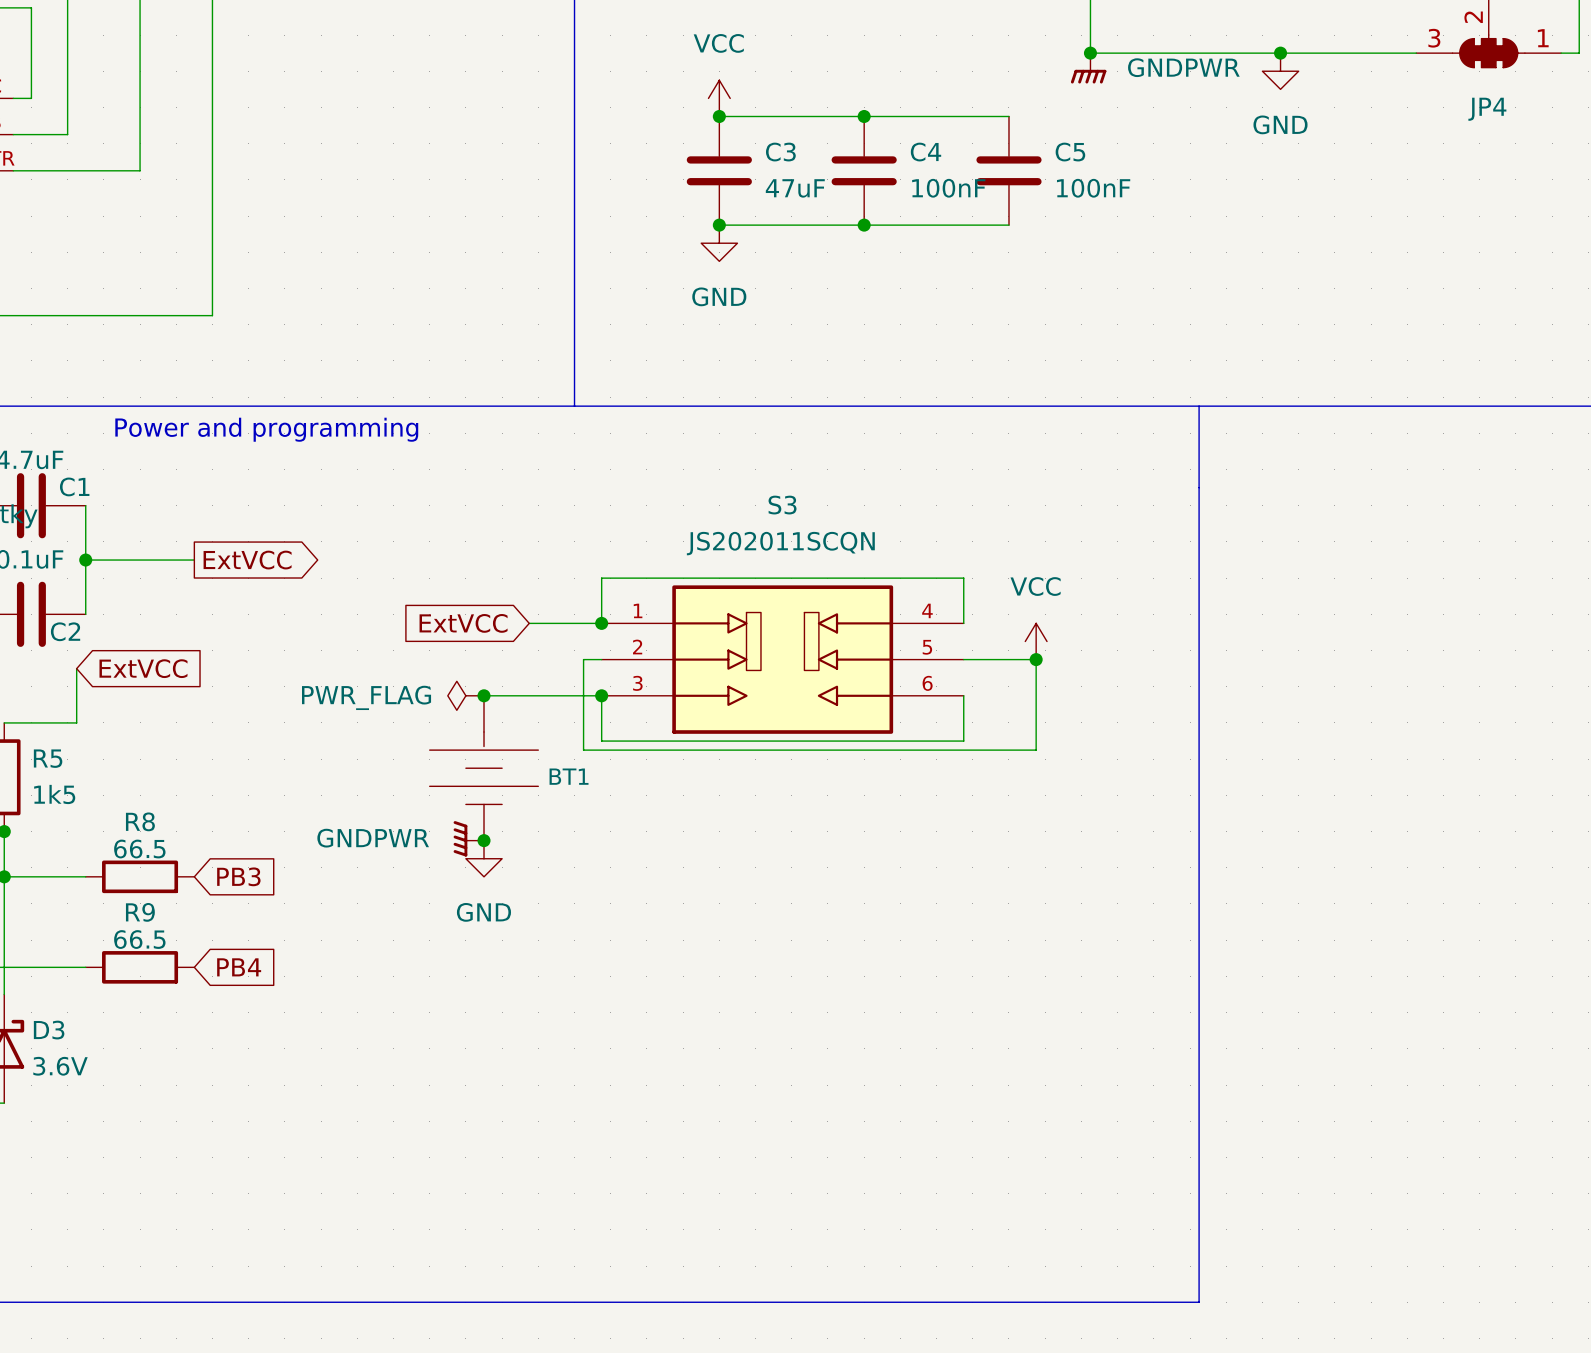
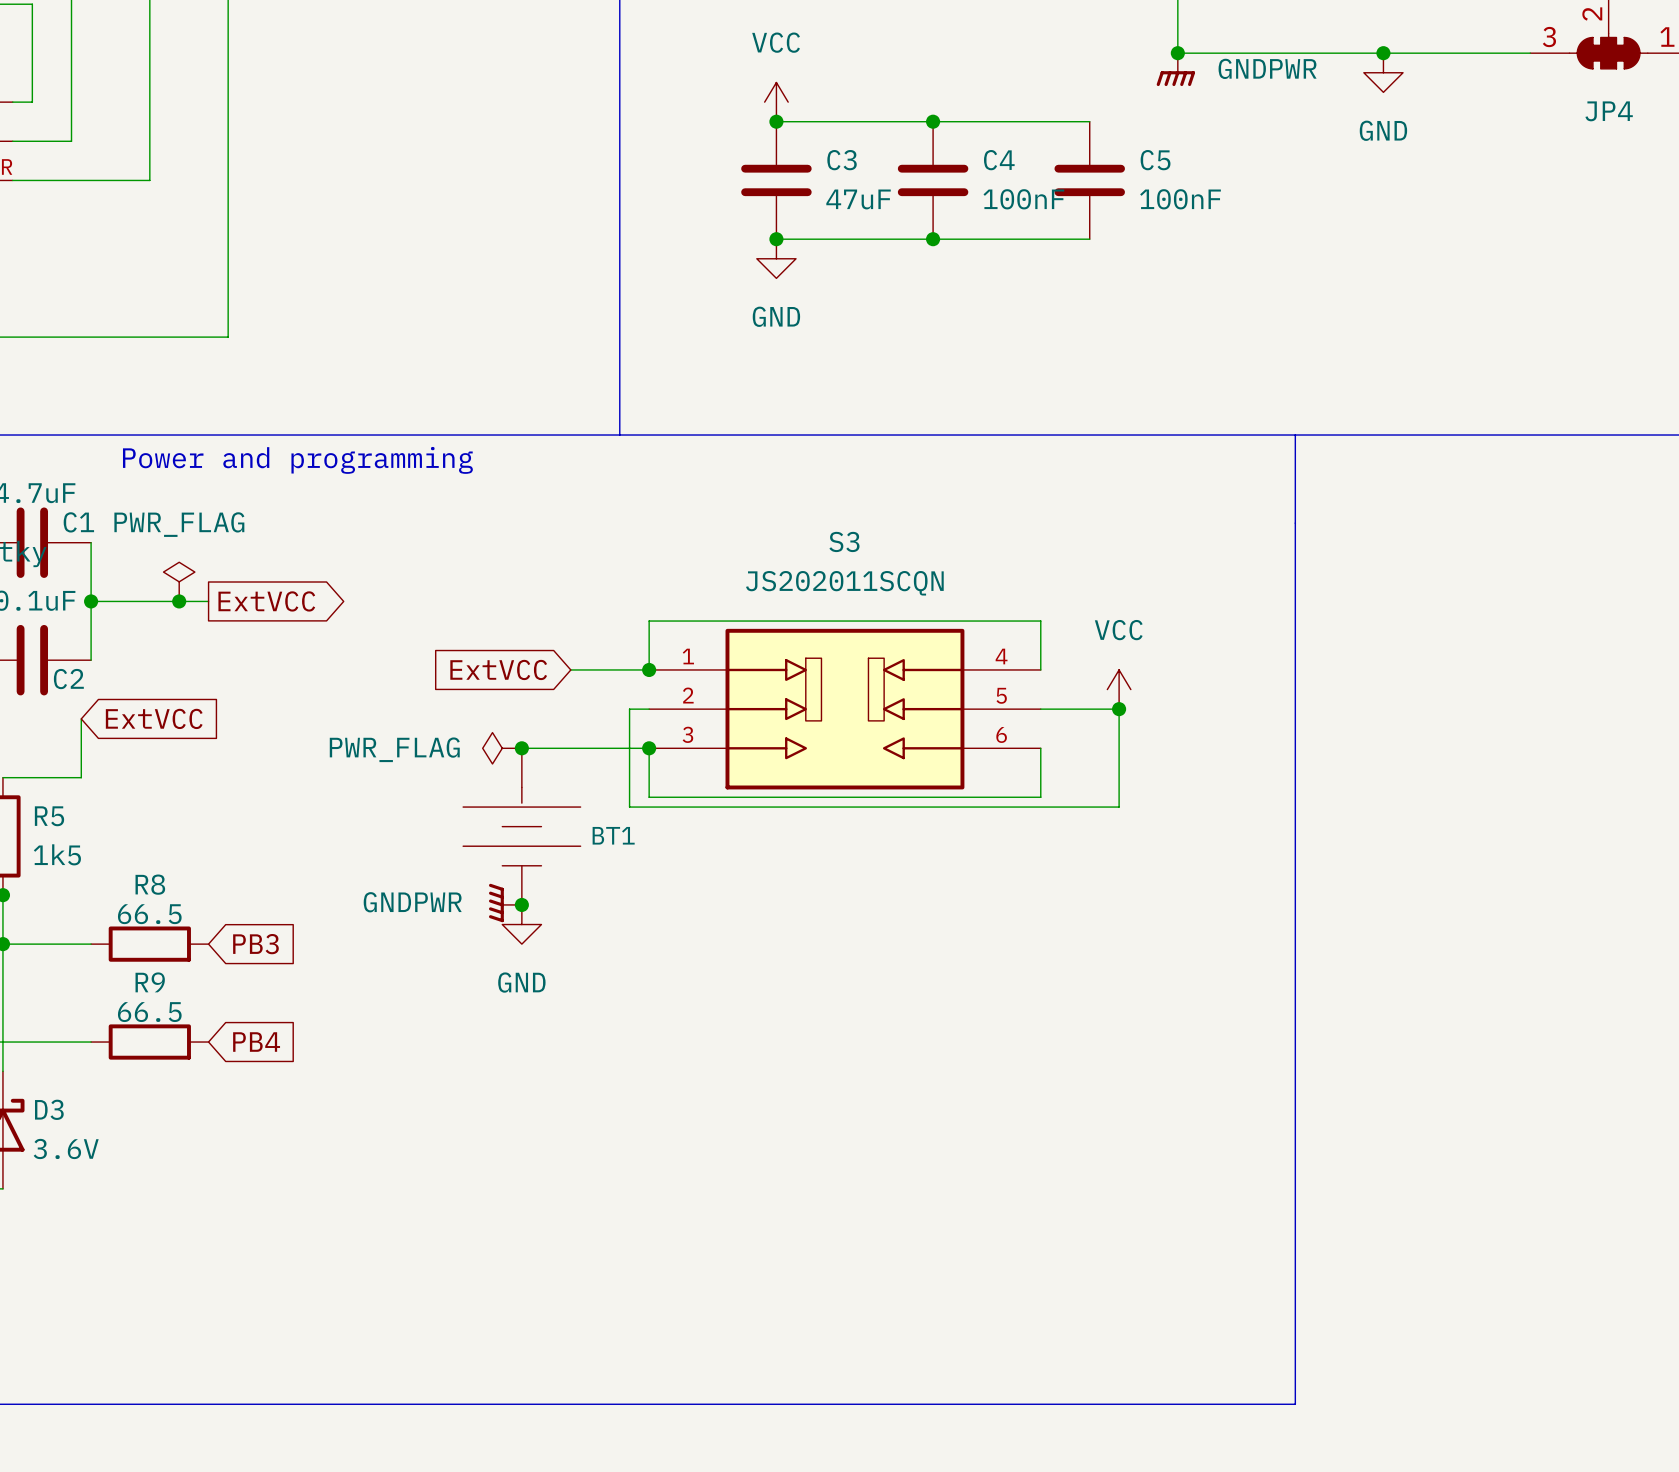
power symbol: none -> PWR_FLAG (179, 581)
junction: none -> (179, 601)

